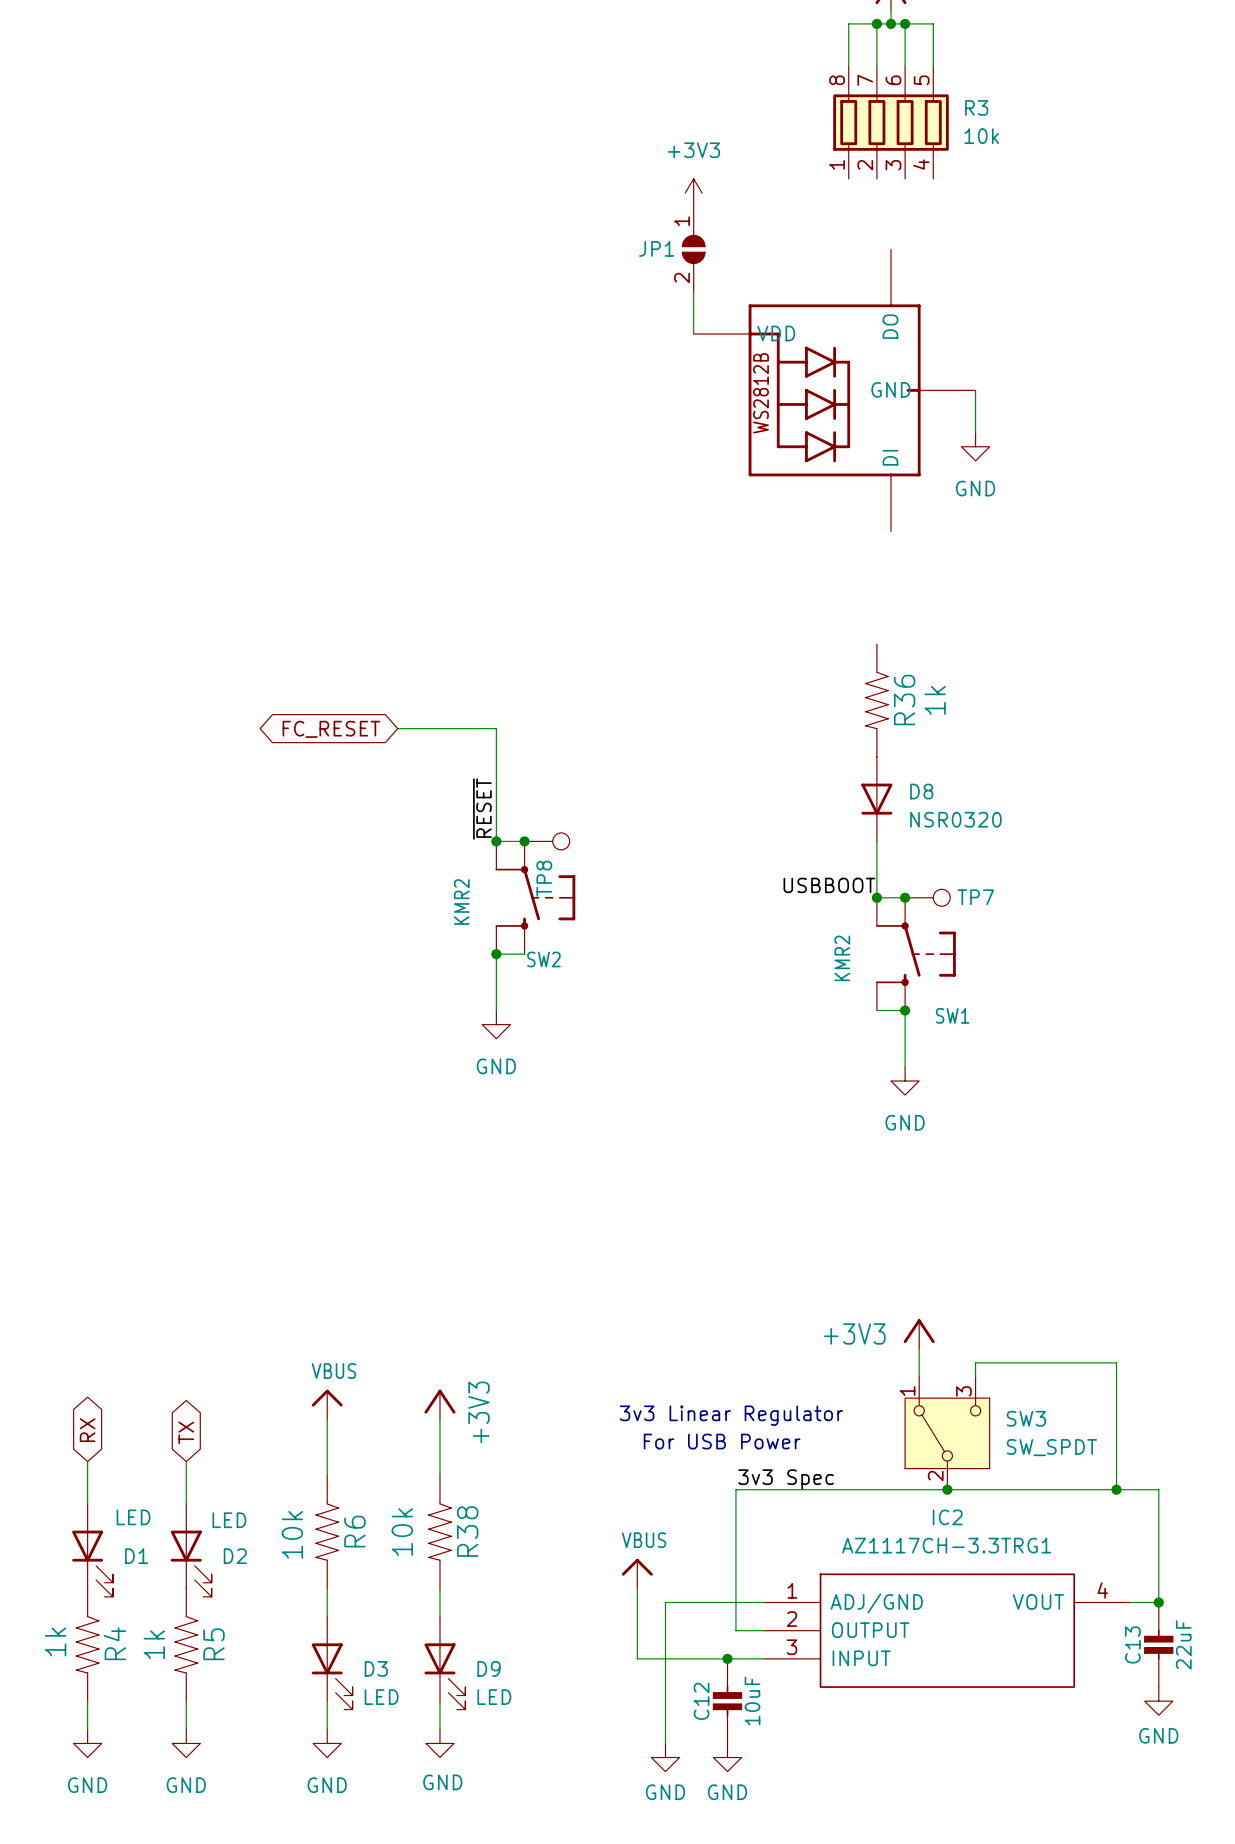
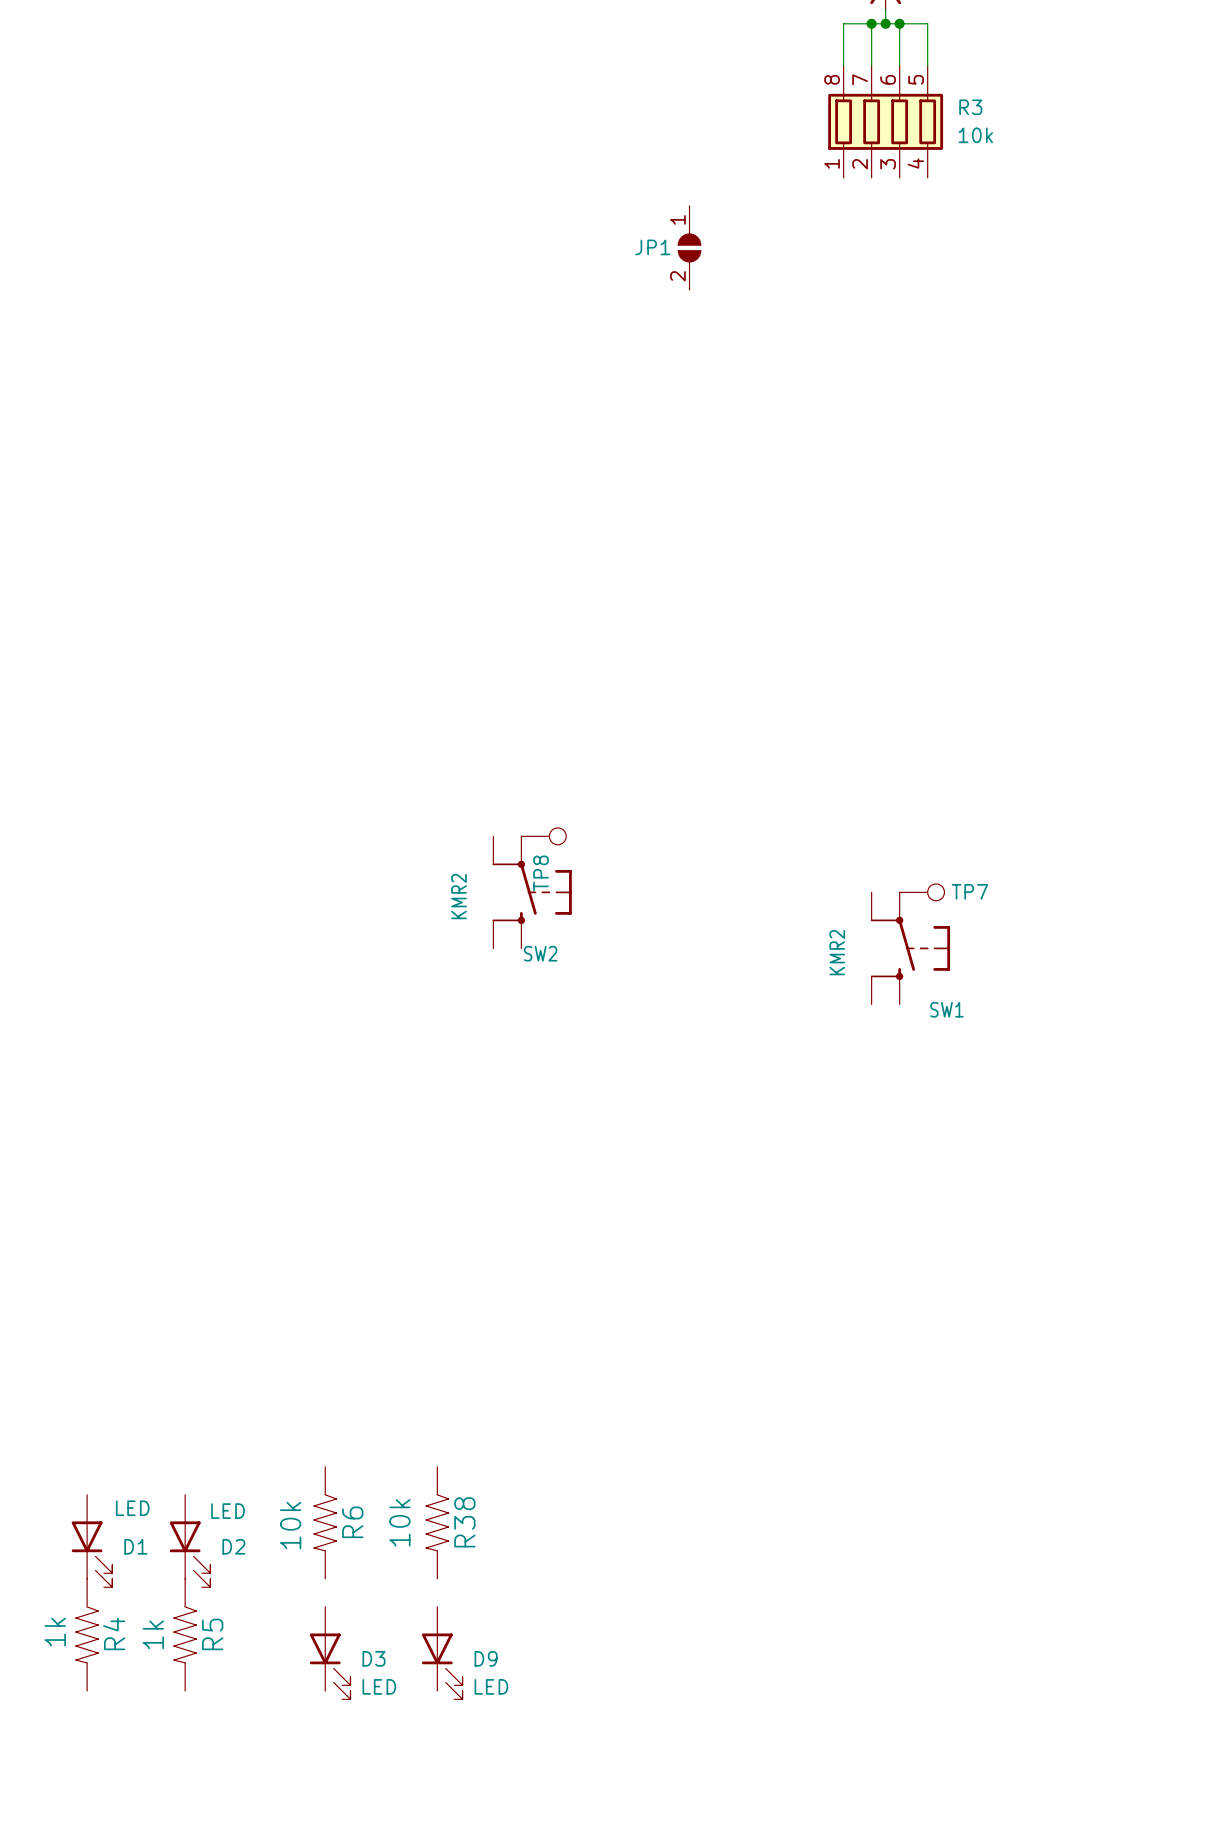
power symbol: +3V3 (693, 193) -> none
wire: (693, 291) (693, 334) -> none
part: (834, 390) -> none
wire: (975, 390) (975, 432) -> none
power symbol: GND (975, 446) -> none
R36: 1k (876, 700) -> none
wire: (397, 728) (496, 728) (496, 841) (524, 841) -> none
global label: FC_RESET (331, 729) -> none
D8: NSR0320 (876, 799) -> none
label: ~{RESET} (482, 809) -> none
junction: (496, 841) -> none
junction: (524, 841) -> none
wire: (876, 841) (876, 897) (905, 897) -> none
label: USBBOOT (829, 885) -> none
junction: (876, 897) -> none
junction: (905, 897) -> none
junction: (496, 954) -> none
wire: (524, 954) (496, 954) (496, 1010) -> none
wire: (876, 1010) (905, 1010) (905, 1066) -> none
junction: (905, 1010) -> none
power symbol: GND (496, 1024) -> none
power symbol: GND (905, 1081) -> none
power symbol: +3V3 (919, 1334) -> none
wire: (919, 1348) (919, 1376) -> none
wire: (975, 1376) (975, 1362) (1116, 1362) (1116, 1489) -> none
power symbol: VBUS (327, 1404) -> none
power symbol: +3V3 (439, 1404) -> none
text: 3v3 Linear Regulator (731, 1415) -> none
wire: (327, 1419) (327, 1475) -> none
wire: (439, 1419) (439, 1475) -> none
global label: RX (87, 1430) -> none
global label: TX (186, 1432) -> none
SW3: SW_SPDT (947, 1433) -> none
text: For USB Power (722, 1441) -> none
wire: (87, 1461) (87, 1503) -> none
wire: (186, 1461) (186, 1503) -> none
label: 3v3 Spec (786, 1479) -> none
junction: (947, 1489) -> none
junction: (1116, 1489) -> none
power symbol: VBUS (637, 1573) -> none
wire: (327, 1588) (327, 1616) -> none
wire: (439, 1588) (439, 1616) -> none
wire: (637, 1588) (637, 1658) (764, 1658) -> none
wire: (764, 1602) (665, 1602) (665, 1743) -> none
wire: (1130, 1602) (1158, 1602) (1158, 1489) (735, 1489) (735, 1630) (764, 1630) -> none
junction: (1158, 1602) -> none
IC2: AZ1117CH-3.3TRG1 (947, 1630) -> none
C13: 22uF (1158, 1644) -> none
junction: (727, 1658) -> none
wire: (87, 1701) (87, 1729) -> none
wire: (186, 1701) (186, 1729) -> none
wire: (327, 1701) (327, 1729) -> none
wire: (439, 1701) (439, 1729) -> none
C12: 10uF (727, 1701) -> none
power symbol: GND (1158, 1701) -> none
power symbol: GND (87, 1743) -> none
power symbol: GND (186, 1743) -> none
power symbol: GND (327, 1743) -> none
power symbol: GND (439, 1743) -> none
power symbol: GND (665, 1757) -> none
power symbol: GND (727, 1757) -> none

